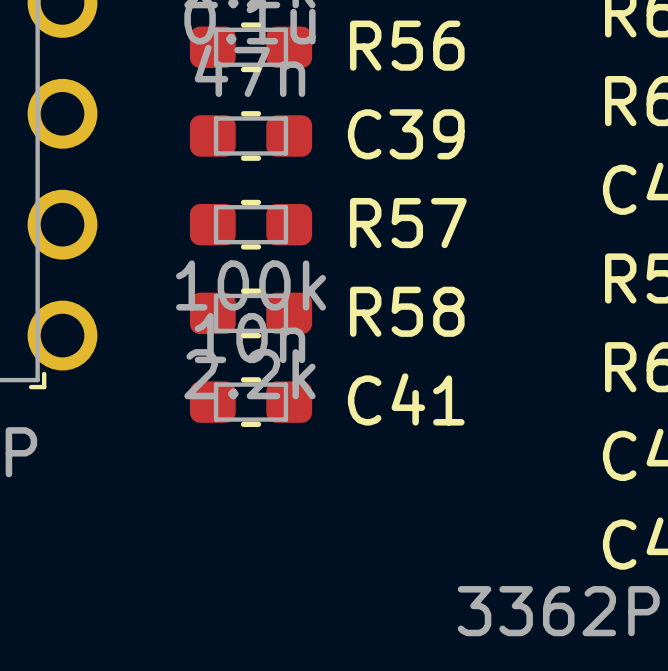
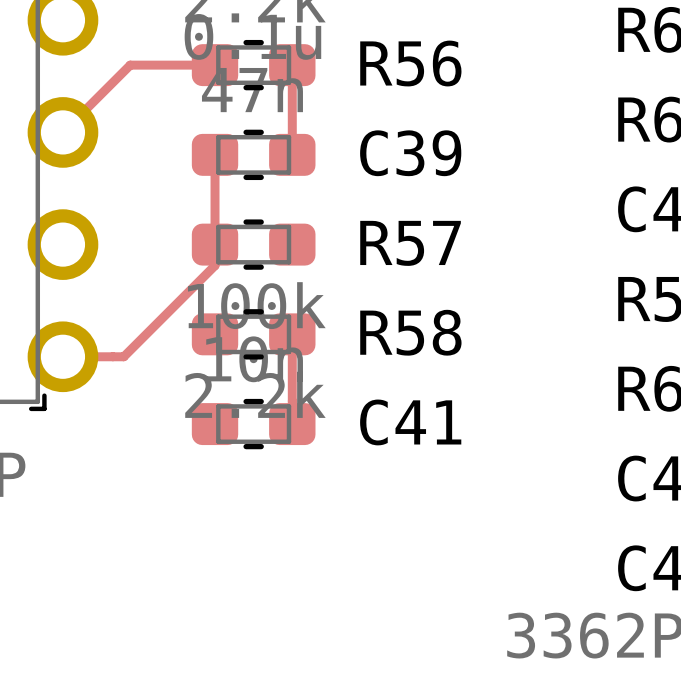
top track: none -> (215, 65) (130, 65) (62, 132)
top track: none -> (292, 65) (292, 154)
top track: none -> (215, 154) (215, 265) (123, 356) (62, 356)
top track: none -> (292, 334) (292, 424)

